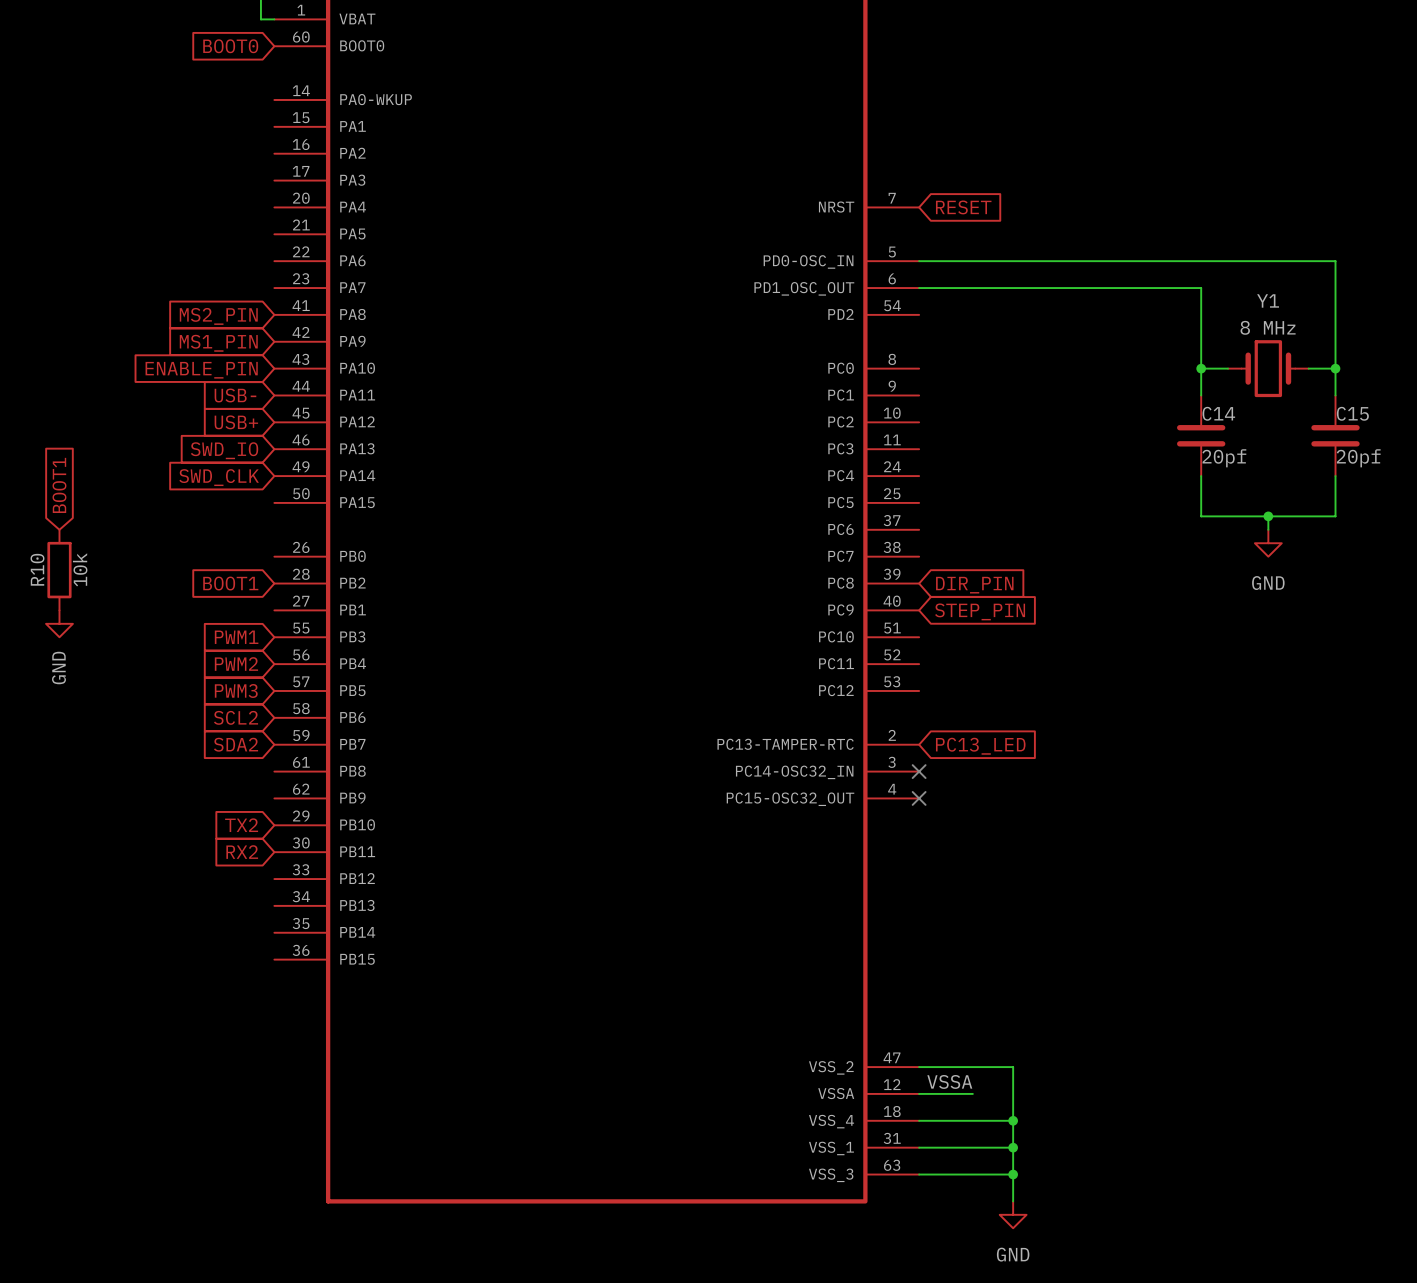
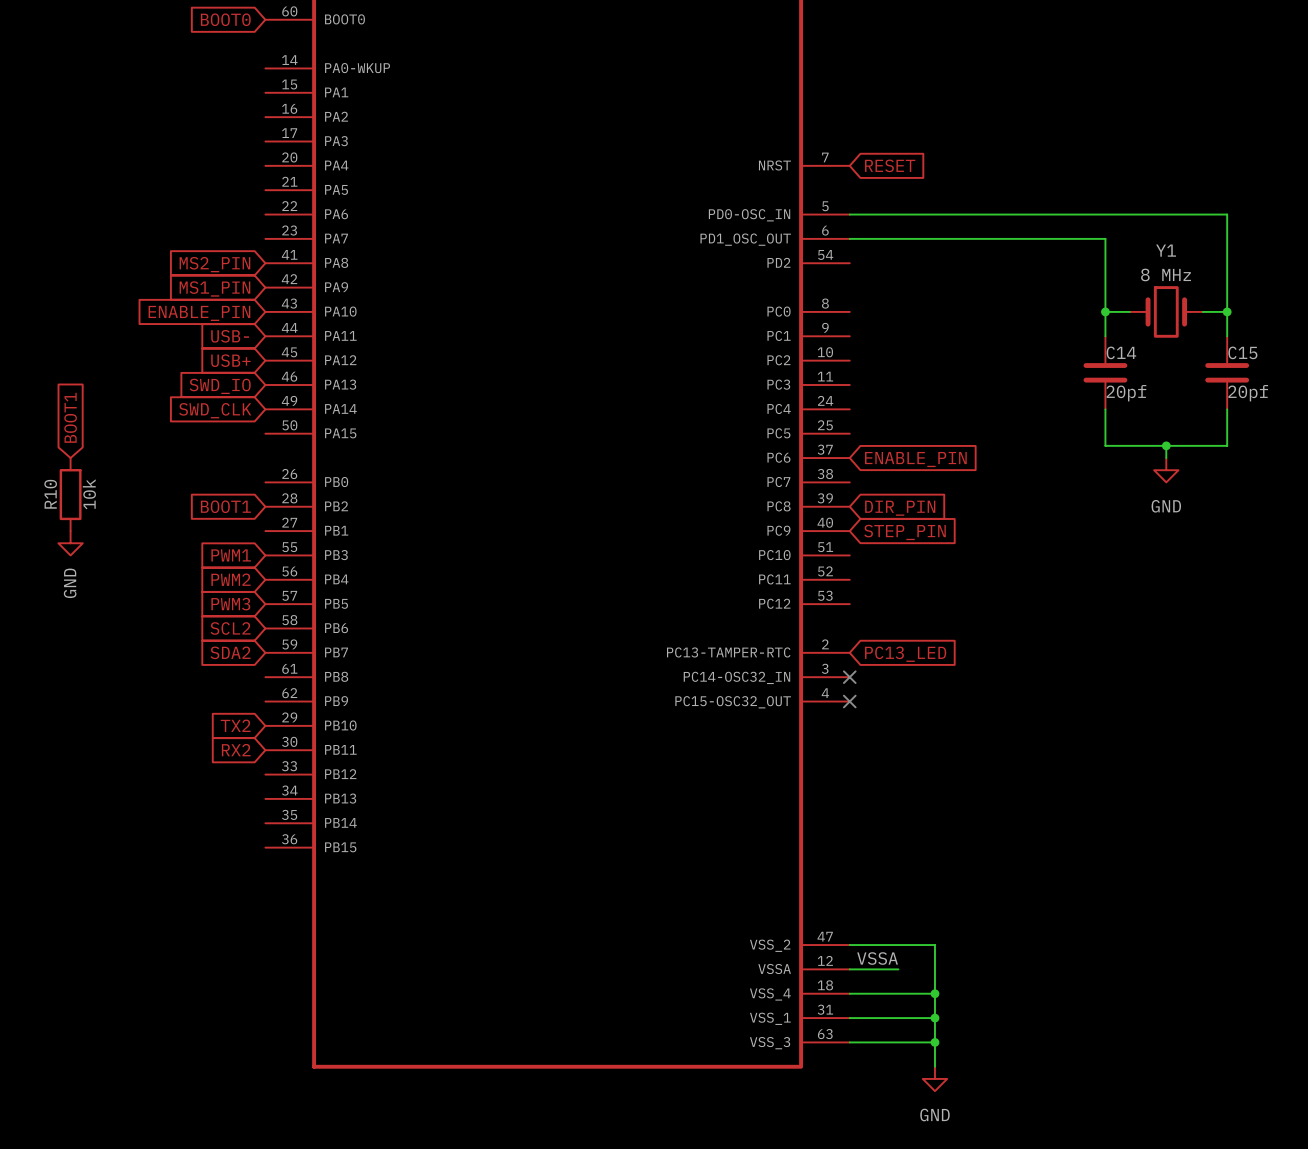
global label: none -> ENABLE_PIN (915, 459)

